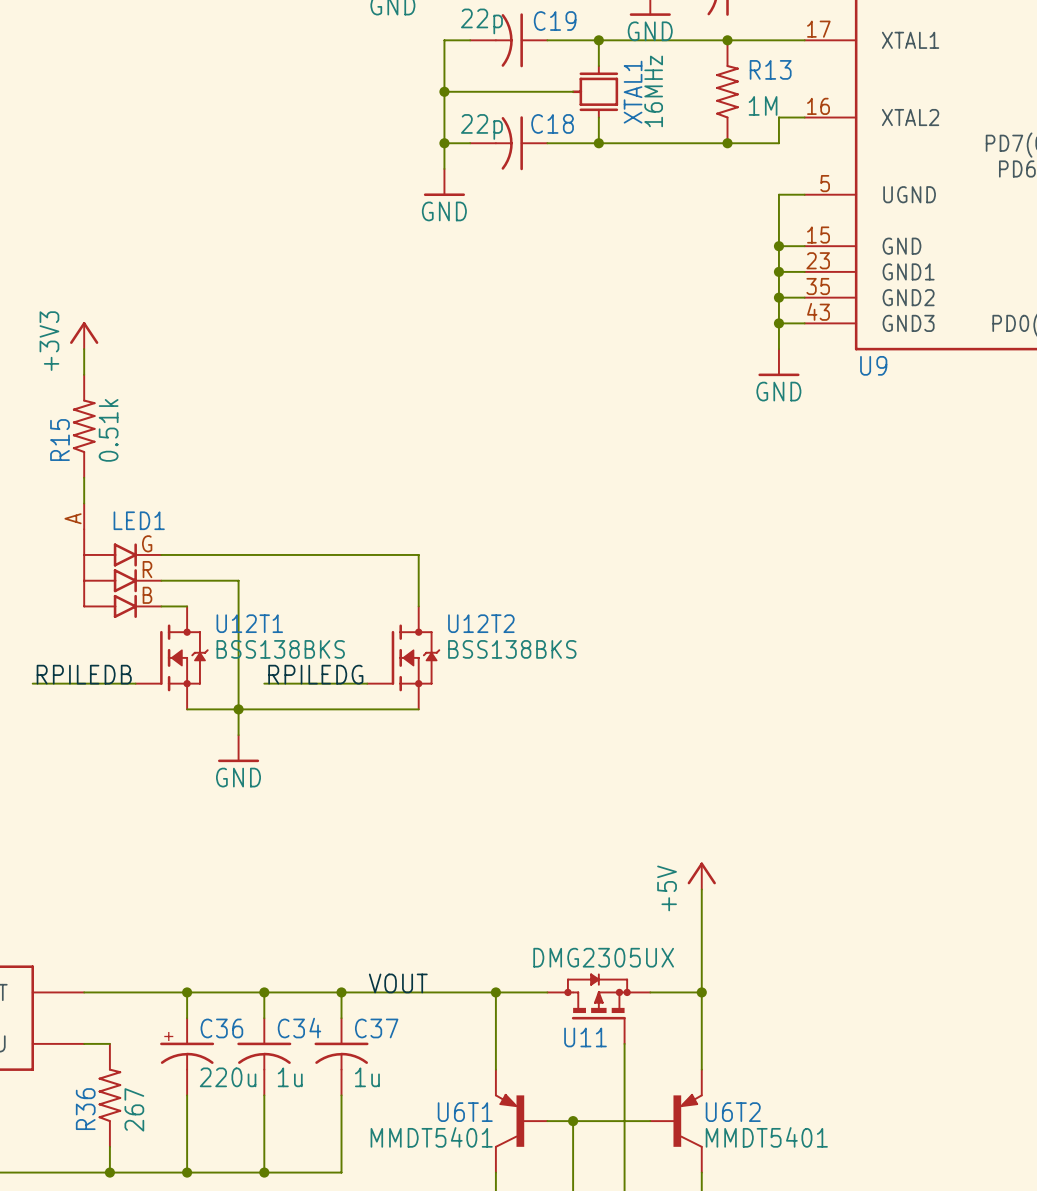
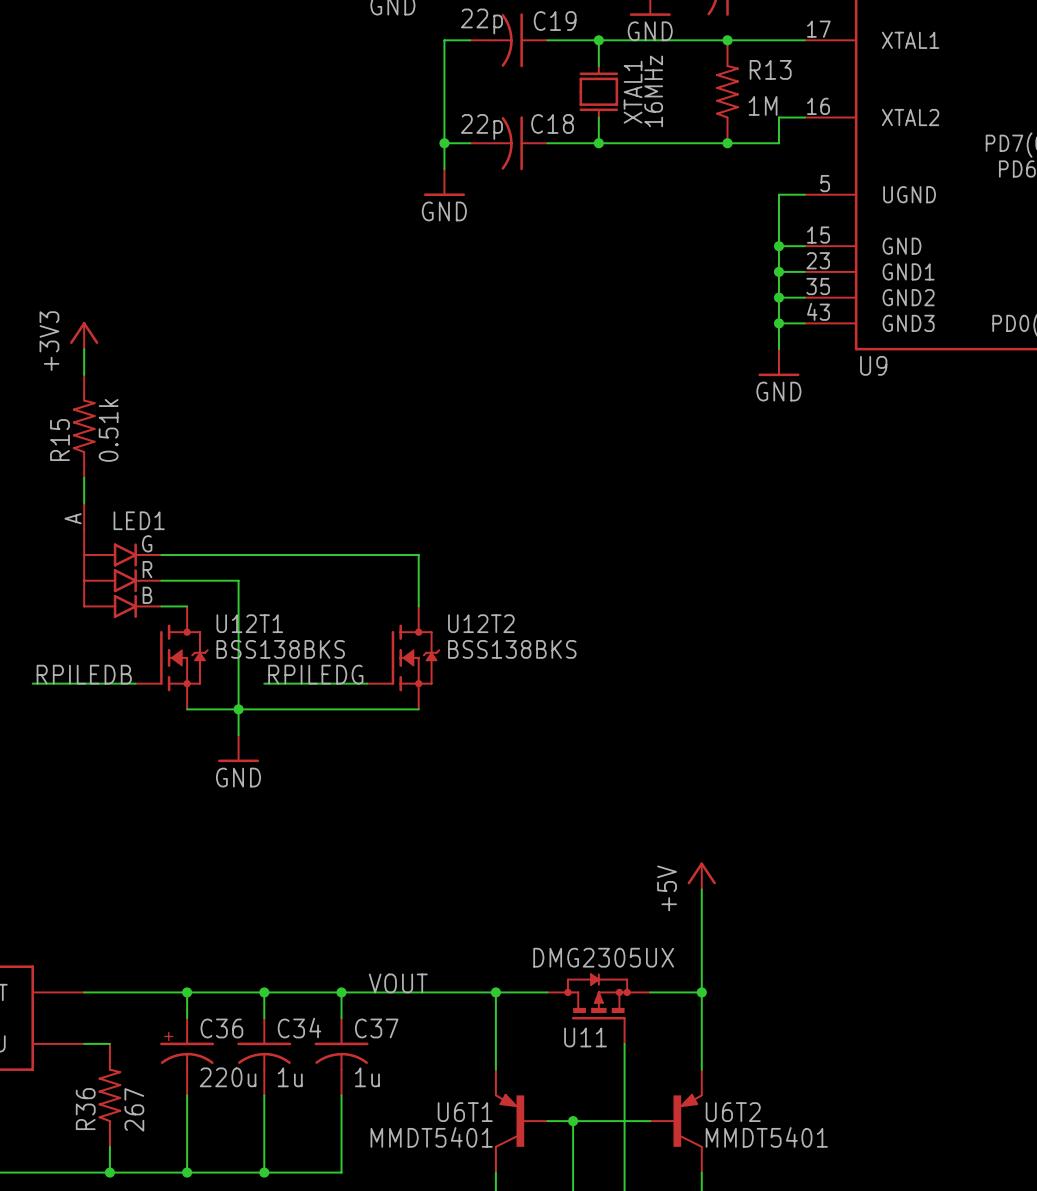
XTAL1 symbol: [571, 65, 619, 119] -> [579, 65, 619, 119]
wire: (444, 91) (573, 91) -> none
junction: (444, 91) -> none

